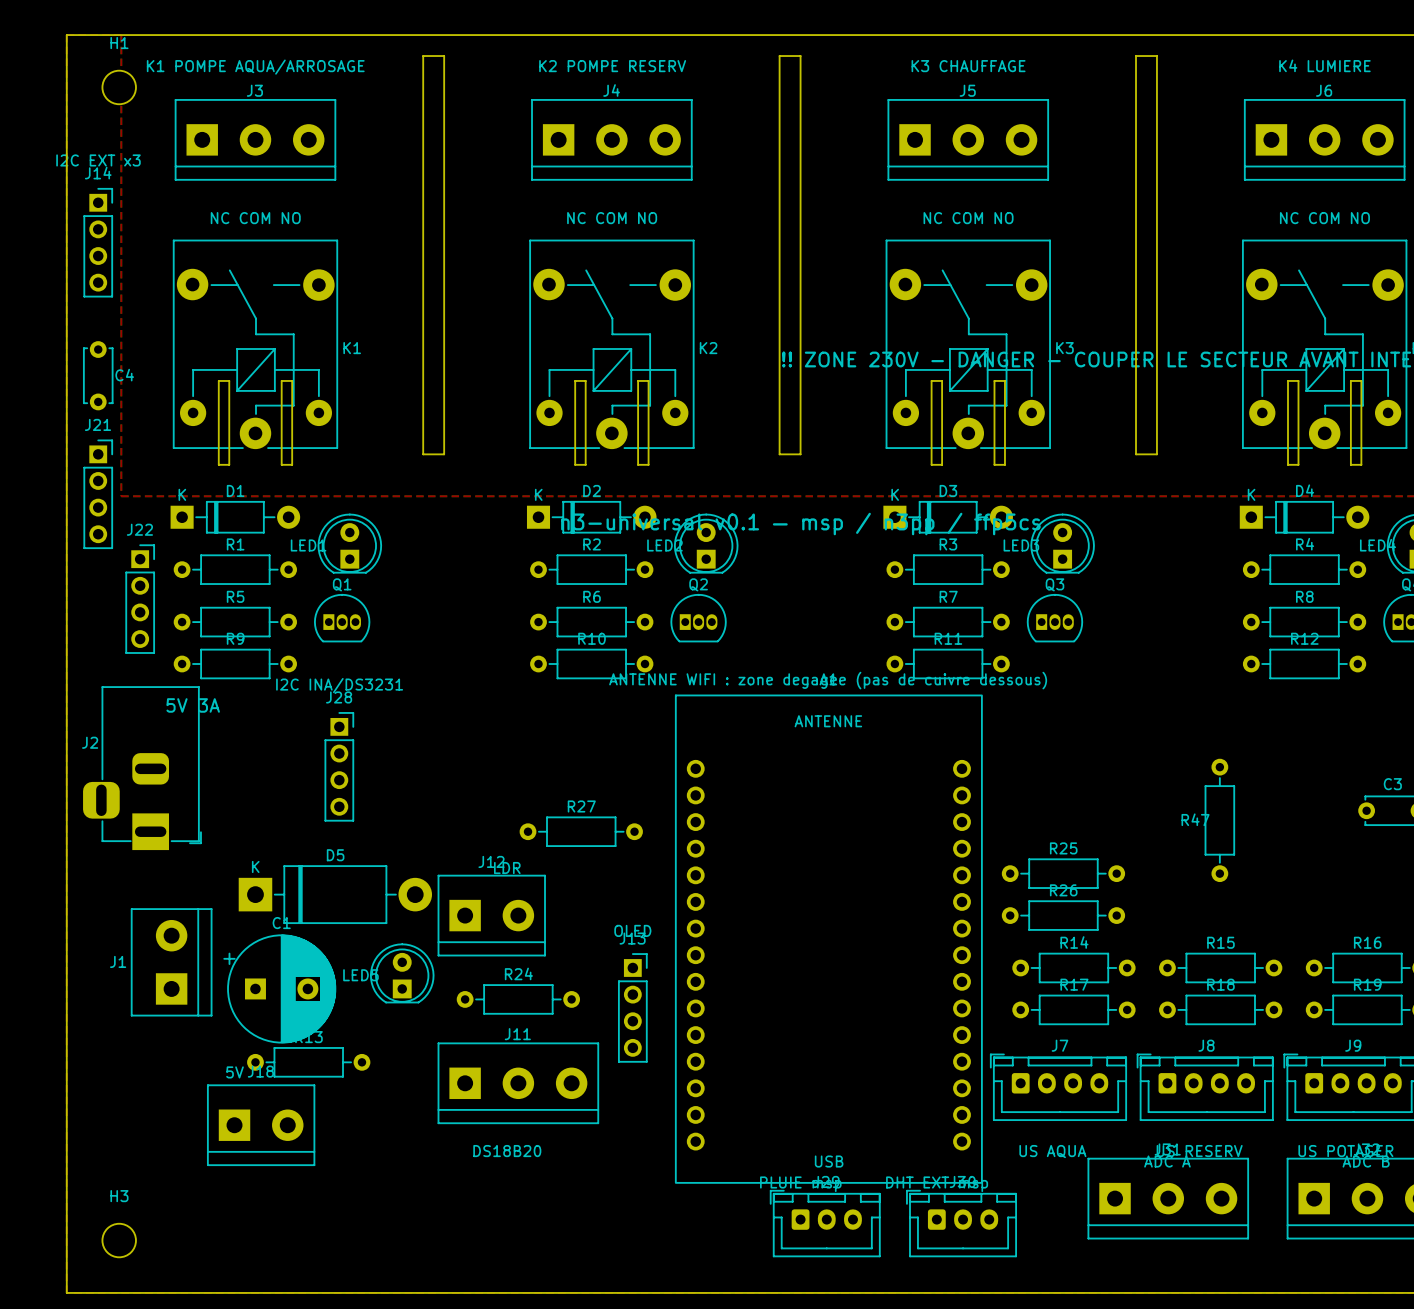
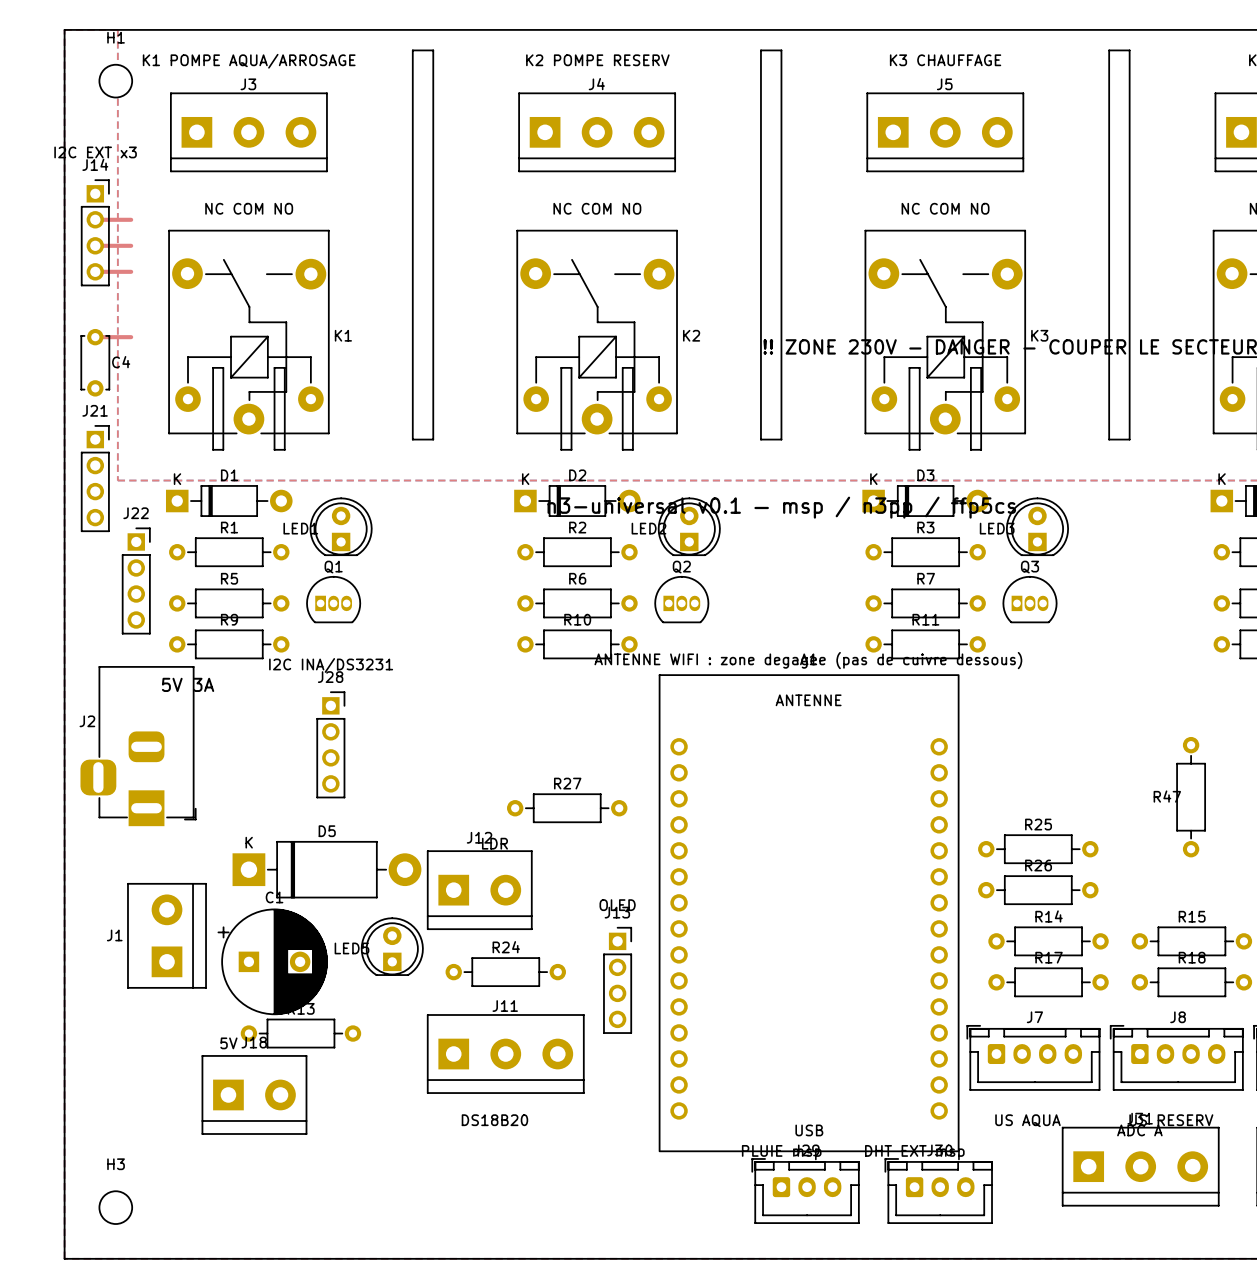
top track: none -> (95, 219) (131, 219)
top track: none -> (95, 245) (131, 245)
top track: none -> (95, 271) (131, 271)
top track: none -> (95, 337) (131, 337)

